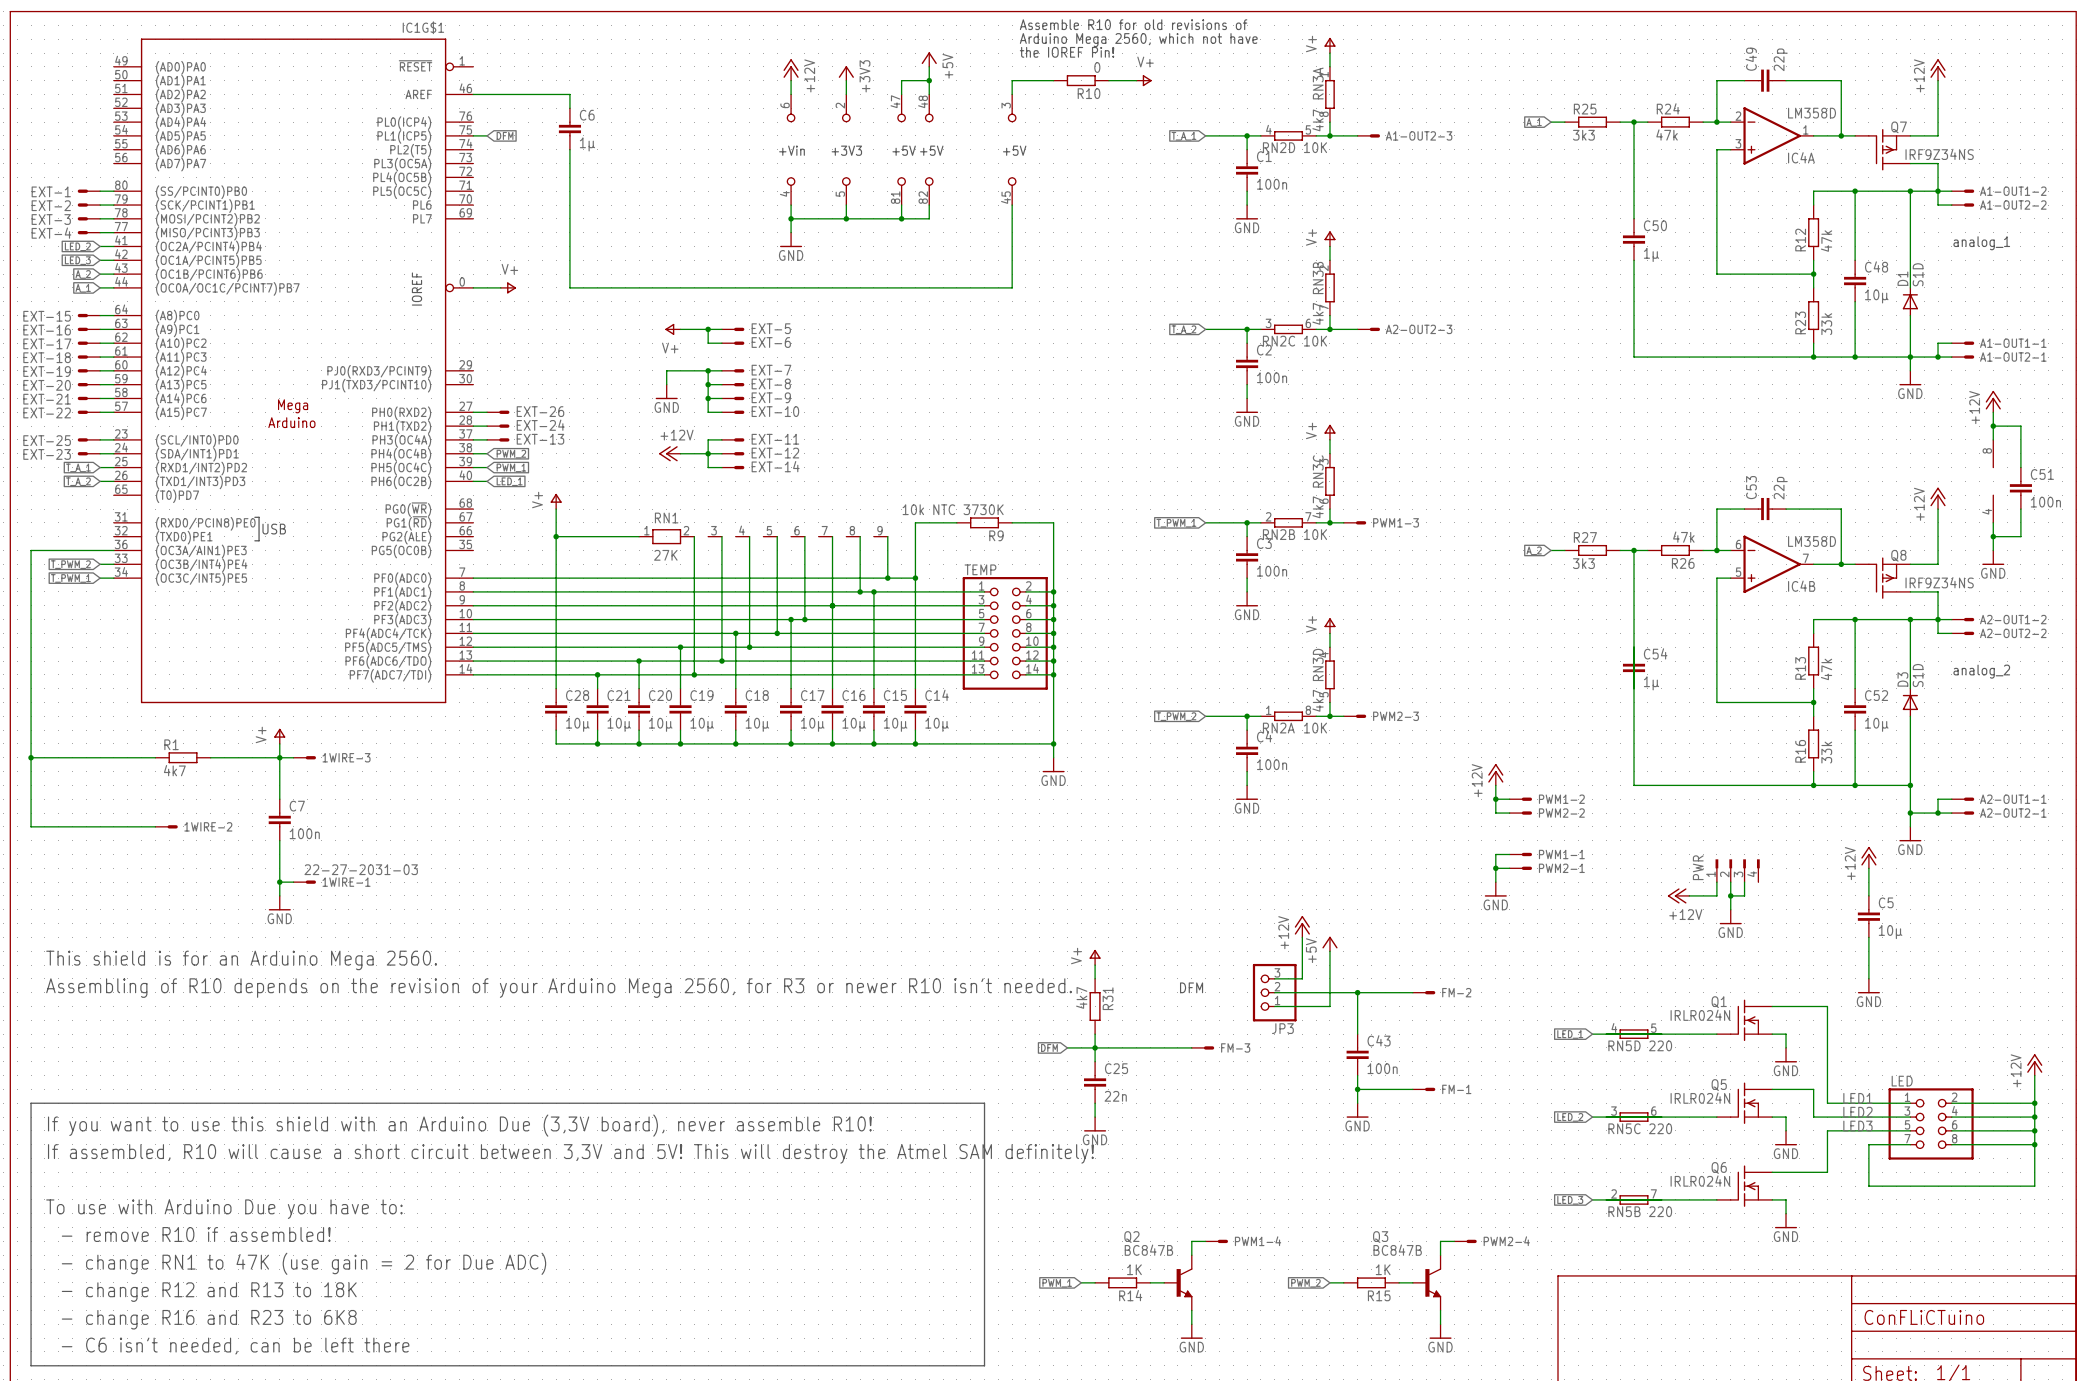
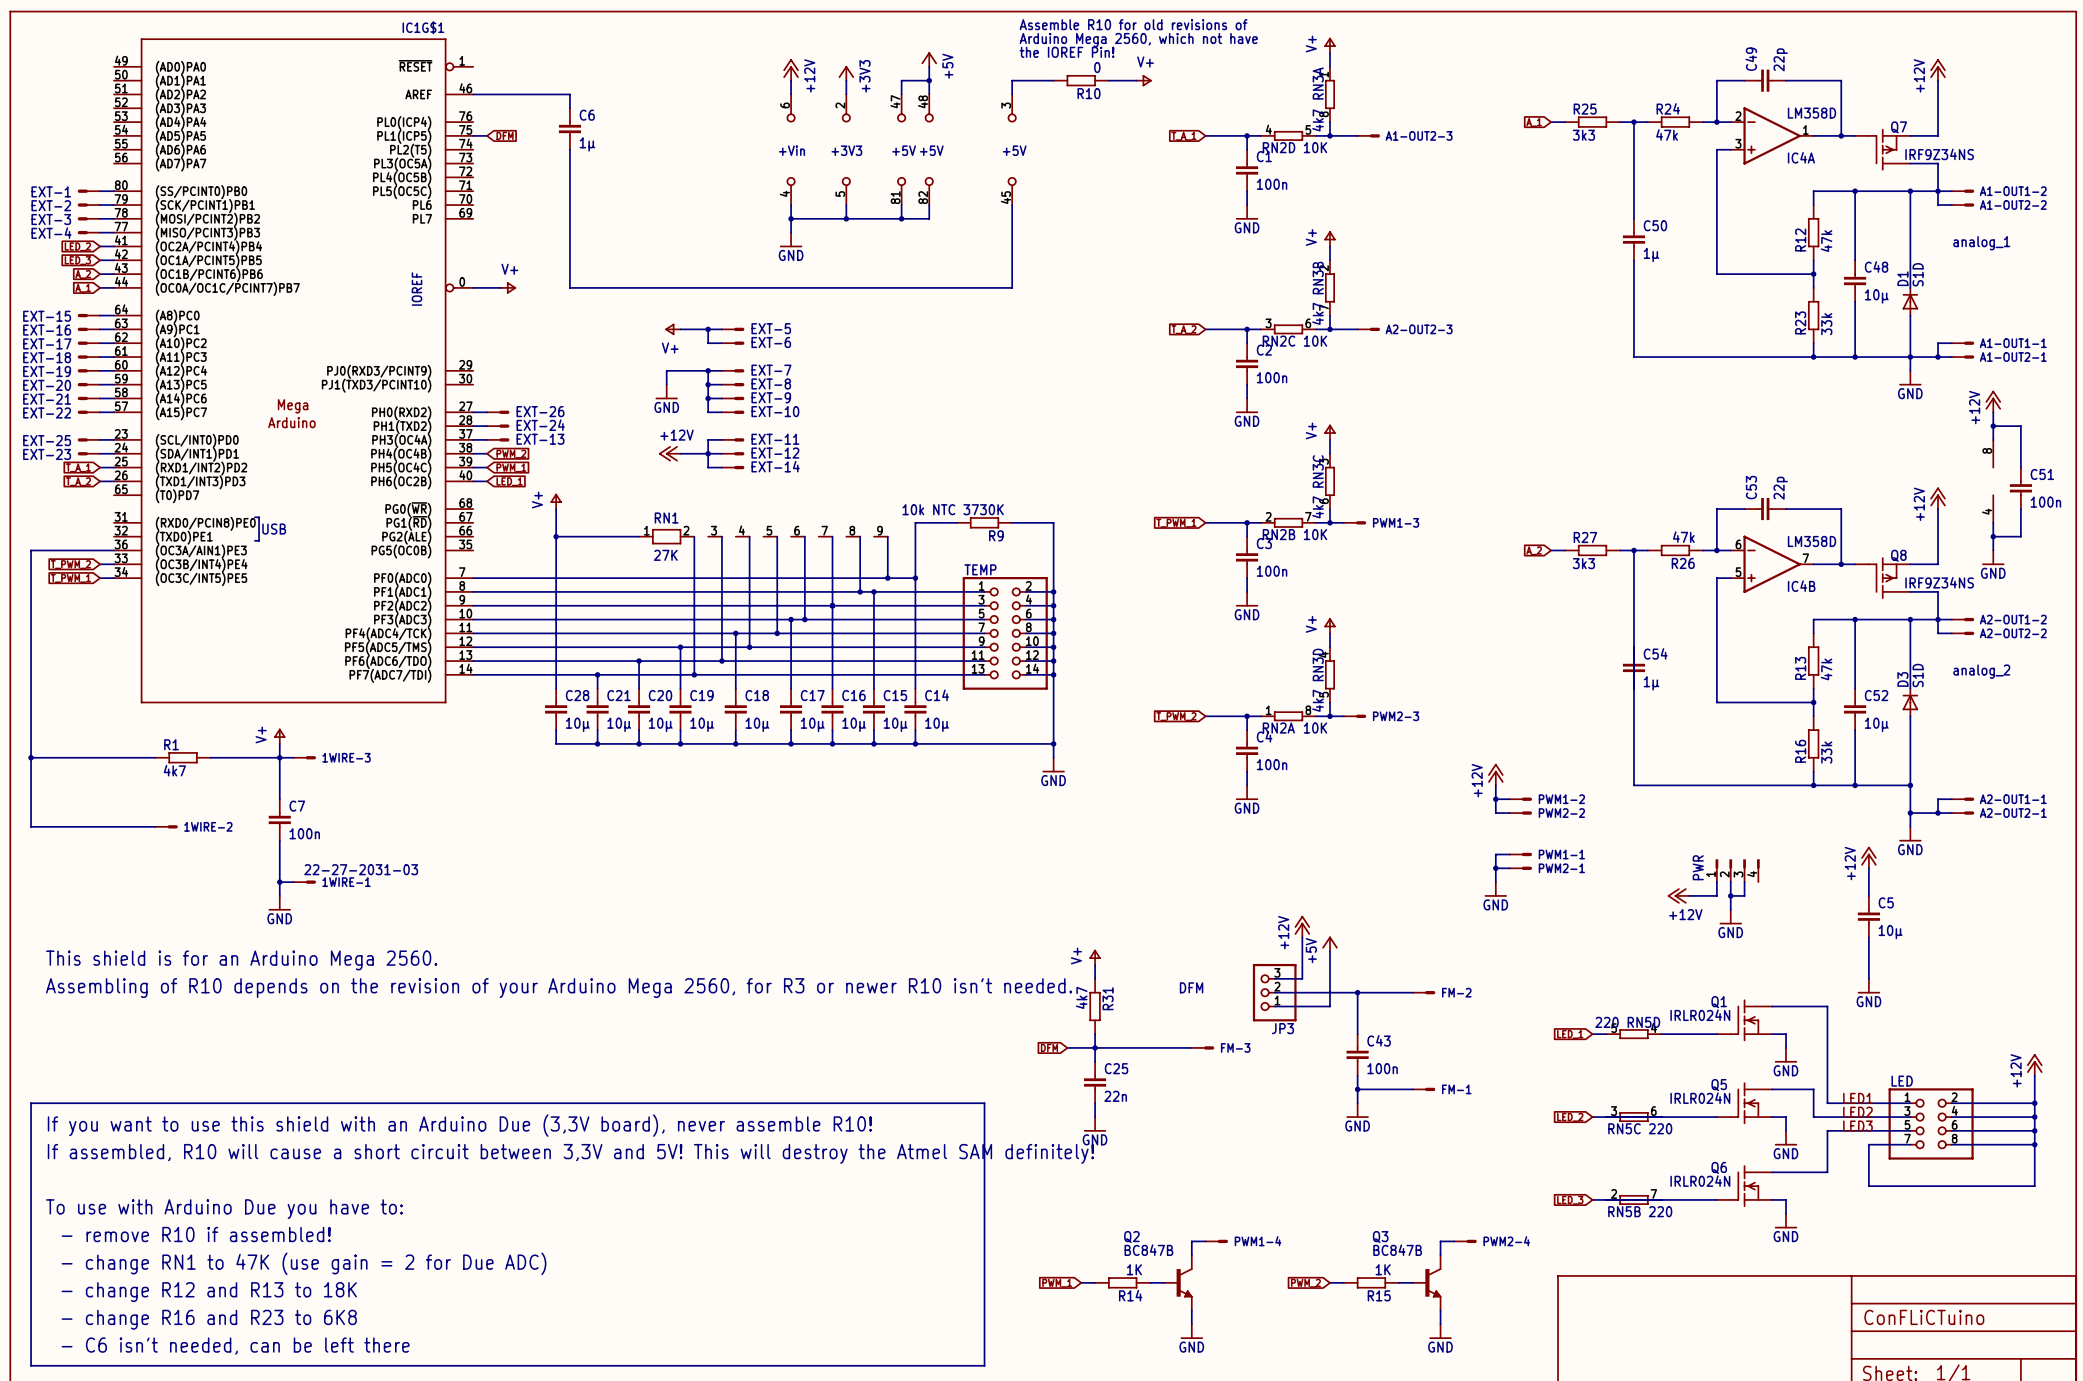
RN5D rotation: 0° (1634, 1034) -> 180° (1634, 1034)

